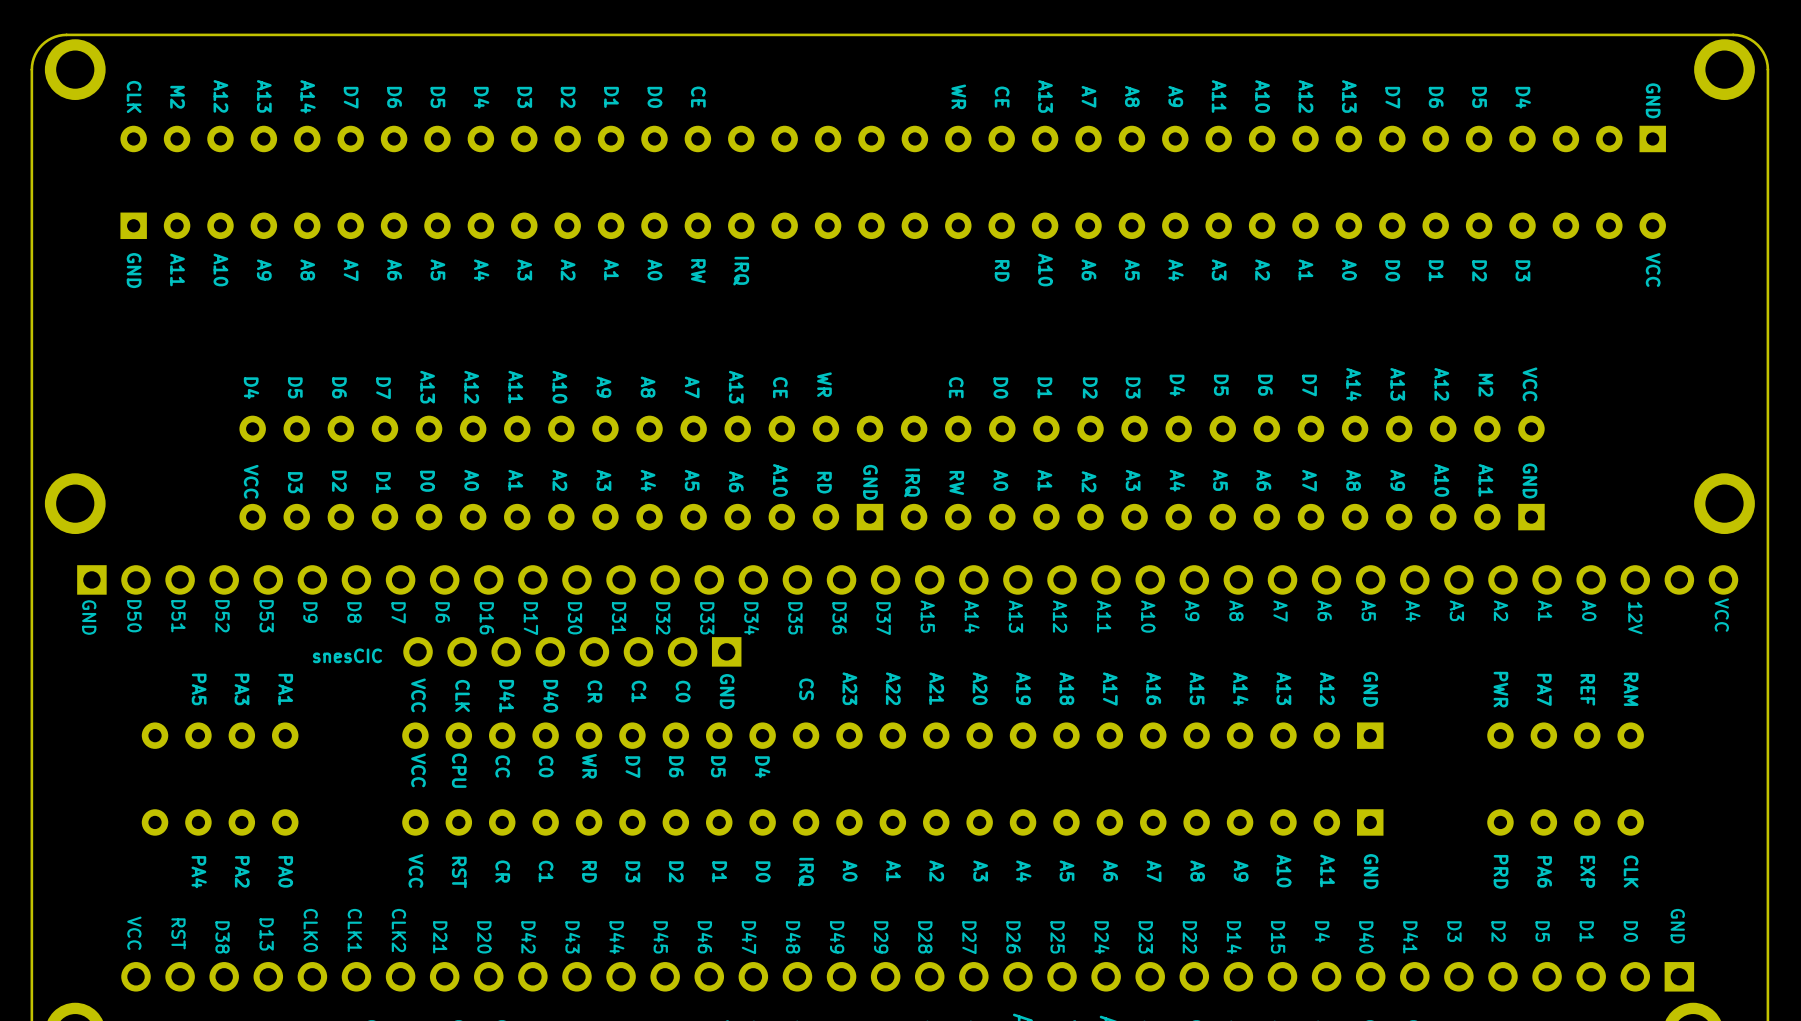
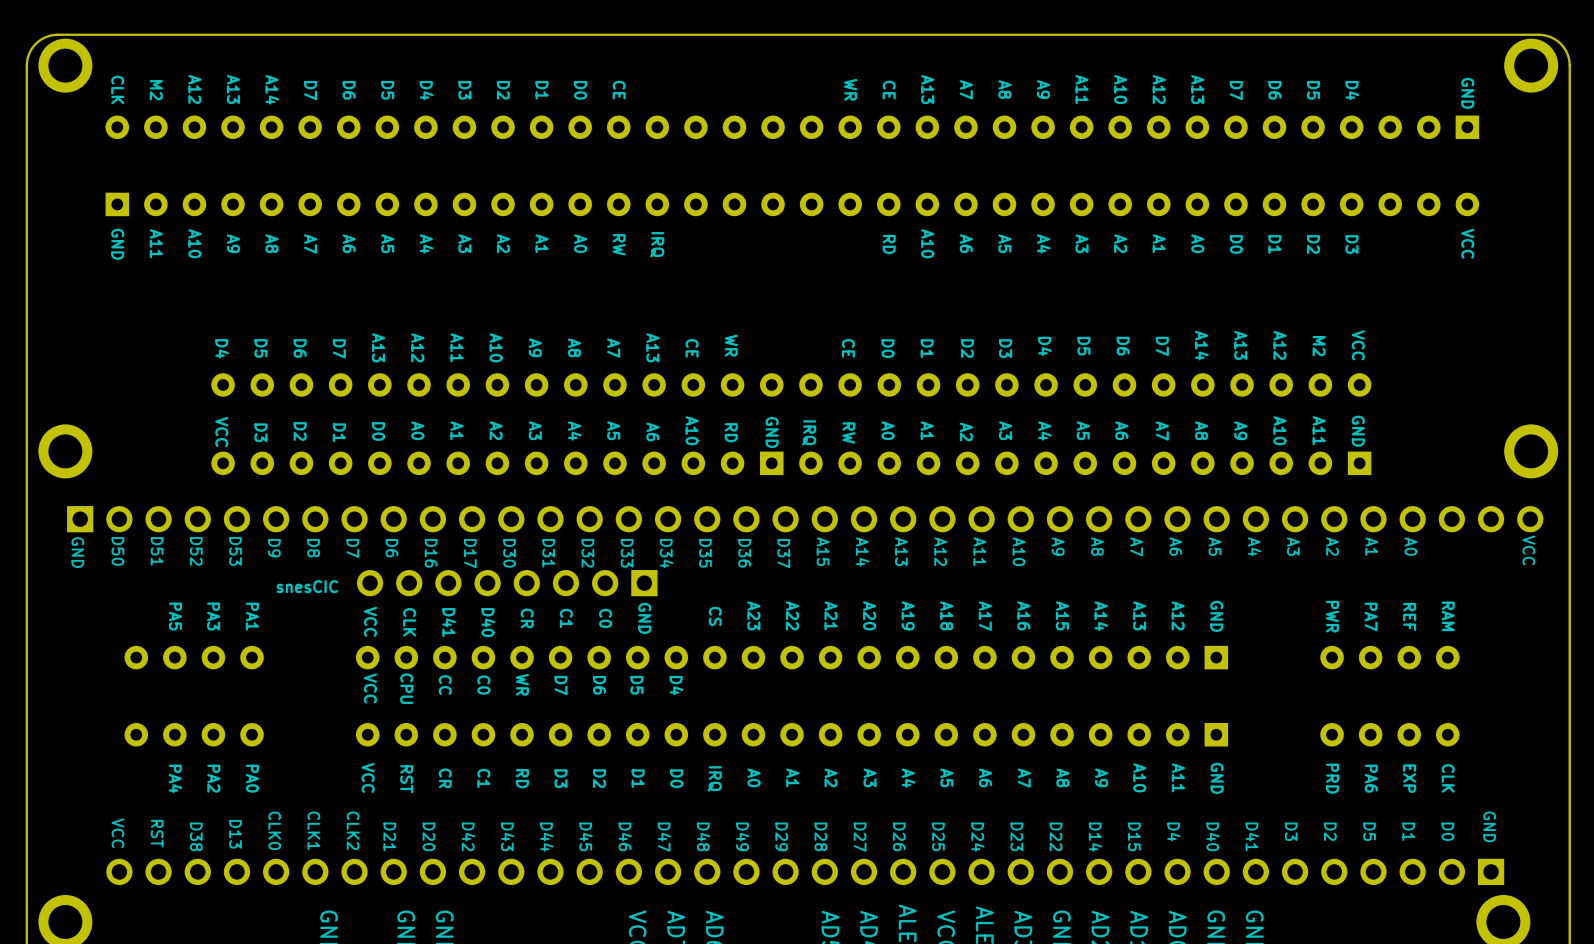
text: 12V (1635, 618) -> none

